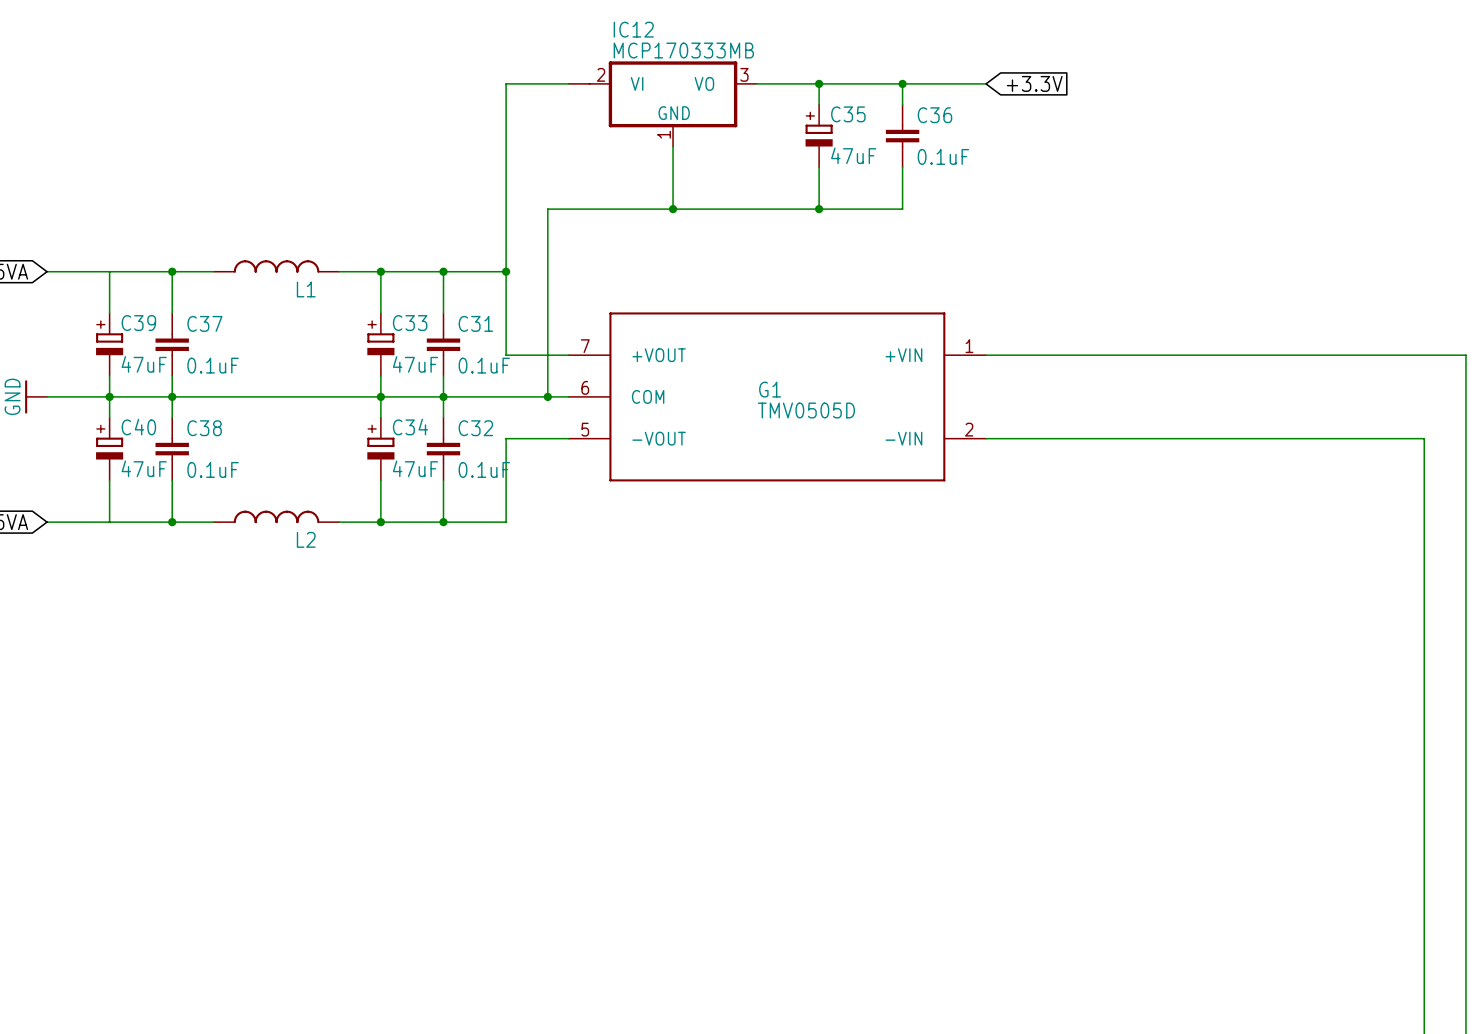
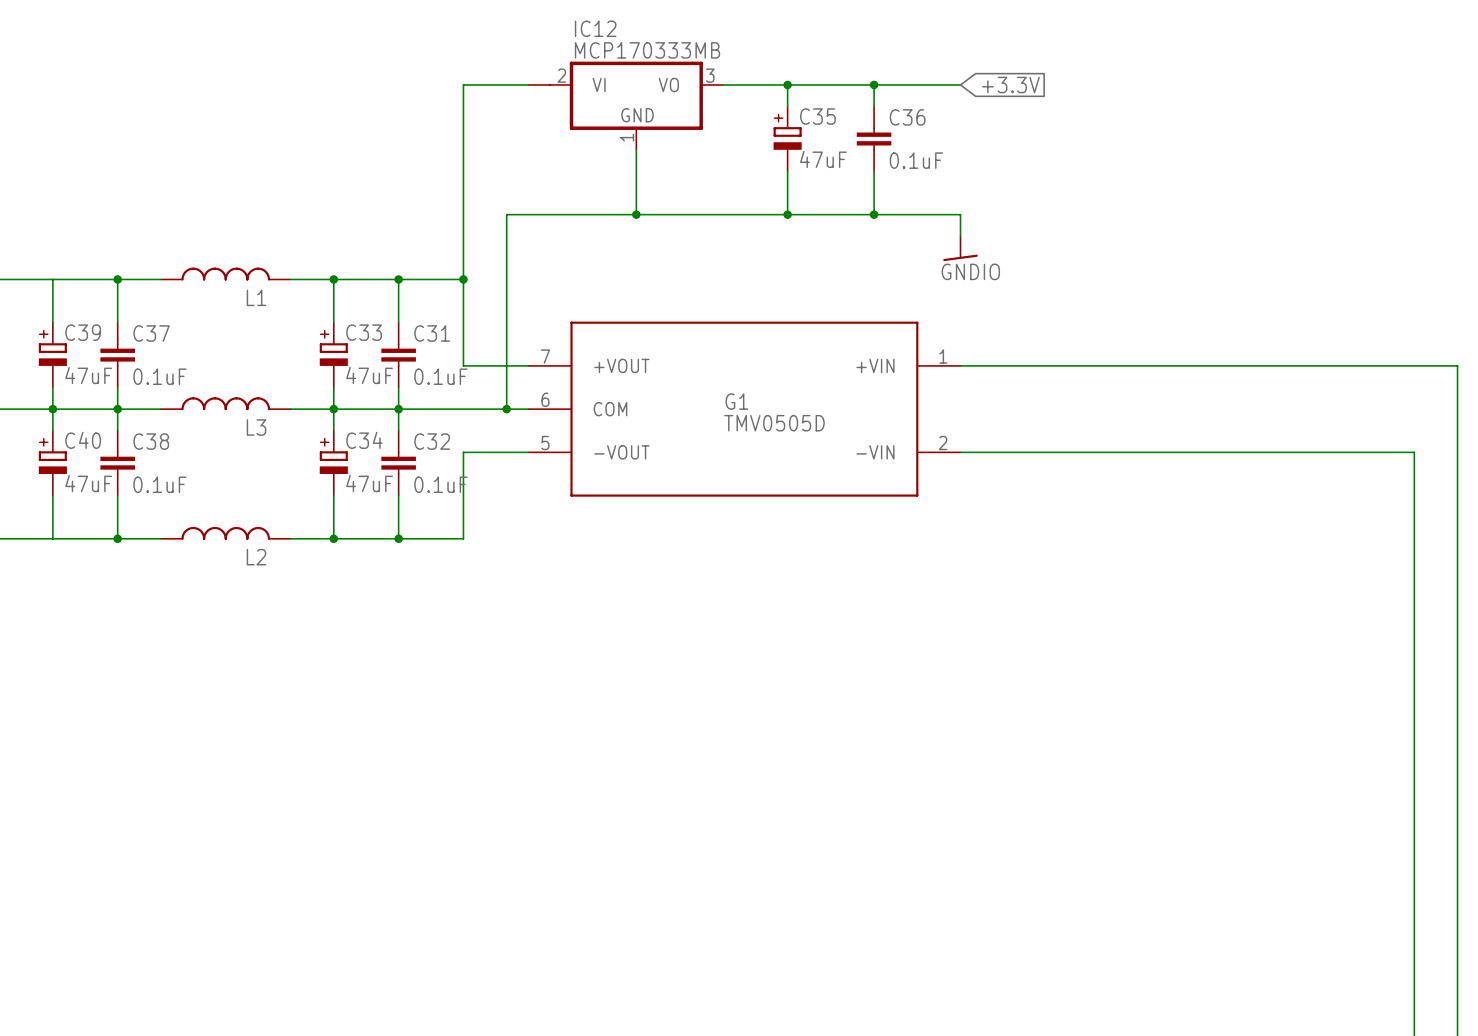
wire: none -> (874, 214) (960, 214) (960, 236)
junction: none -> (874, 214)
power symbol: none -> GNDIO (960, 248)
L3: none -> (225, 403)
wire: (213, 396) (339, 396) -> none

